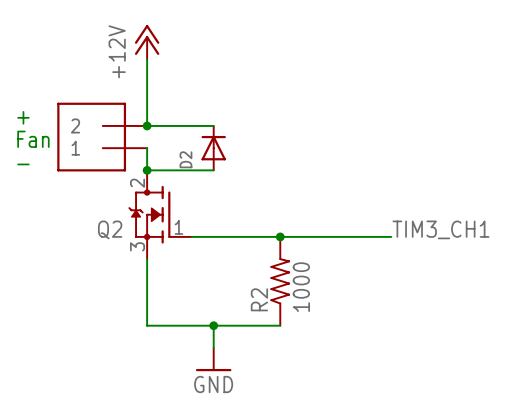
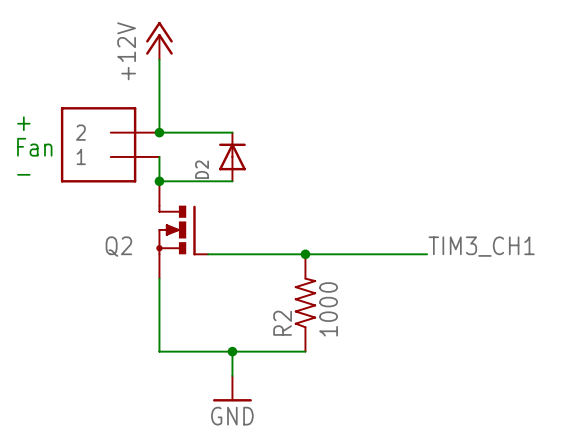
Q2 symbol: [128, 170, 192, 260] -> [156, 181, 209, 279]

